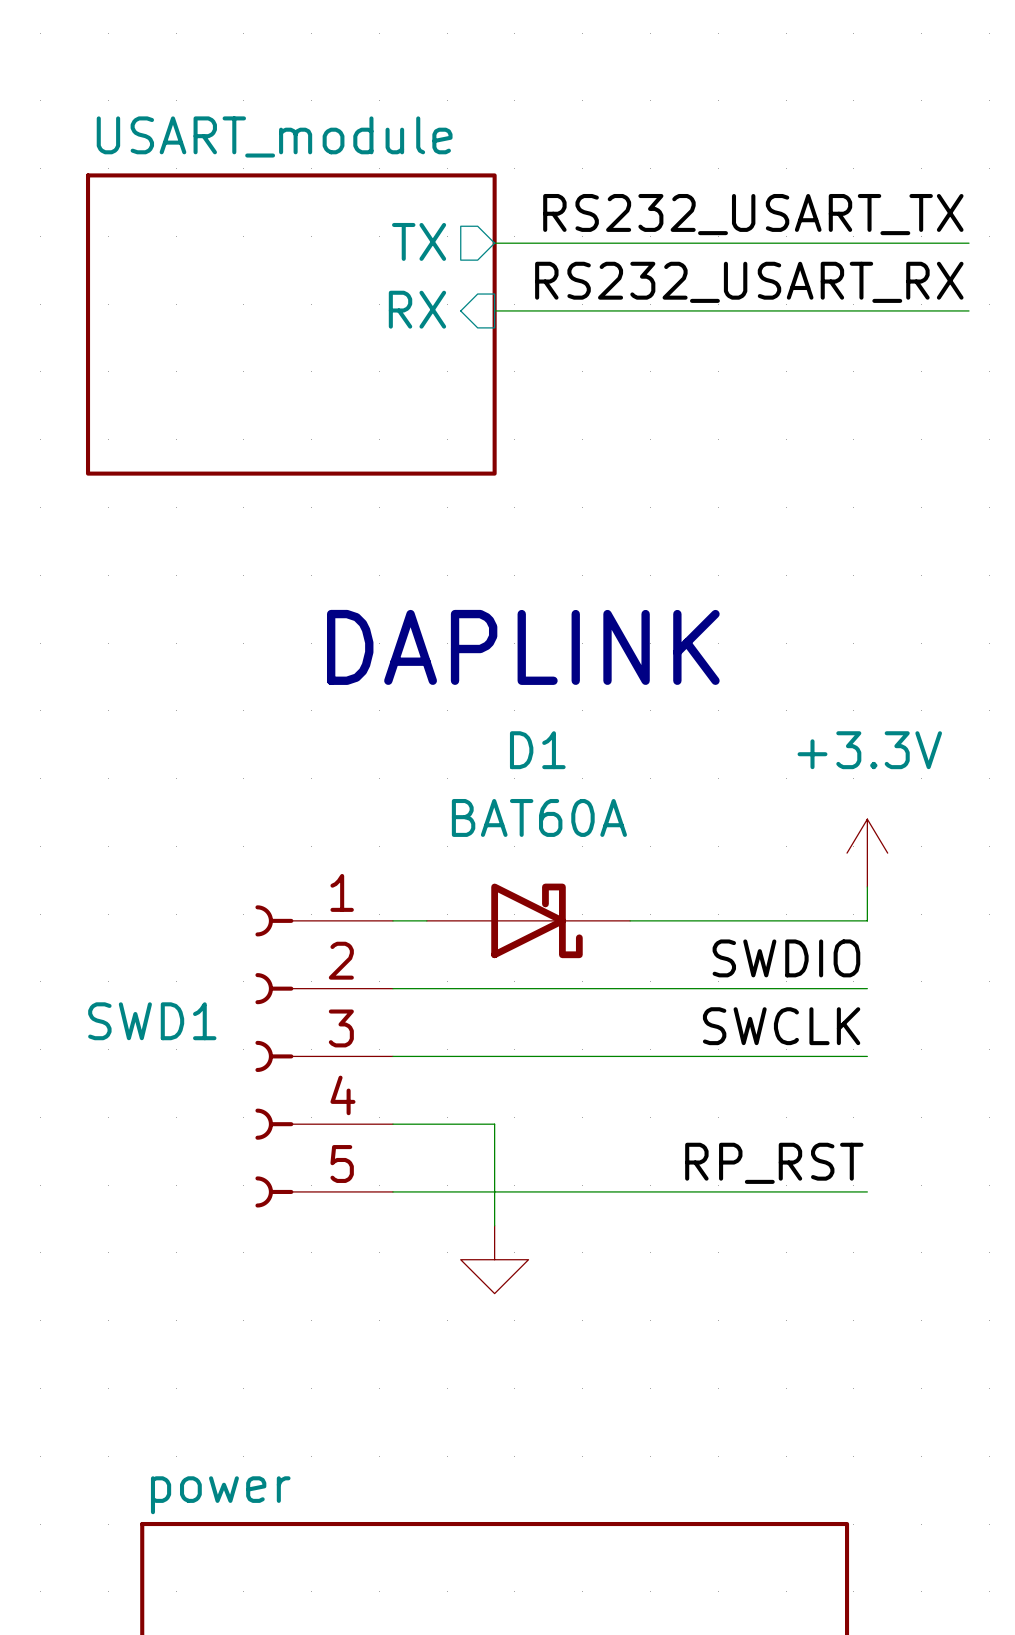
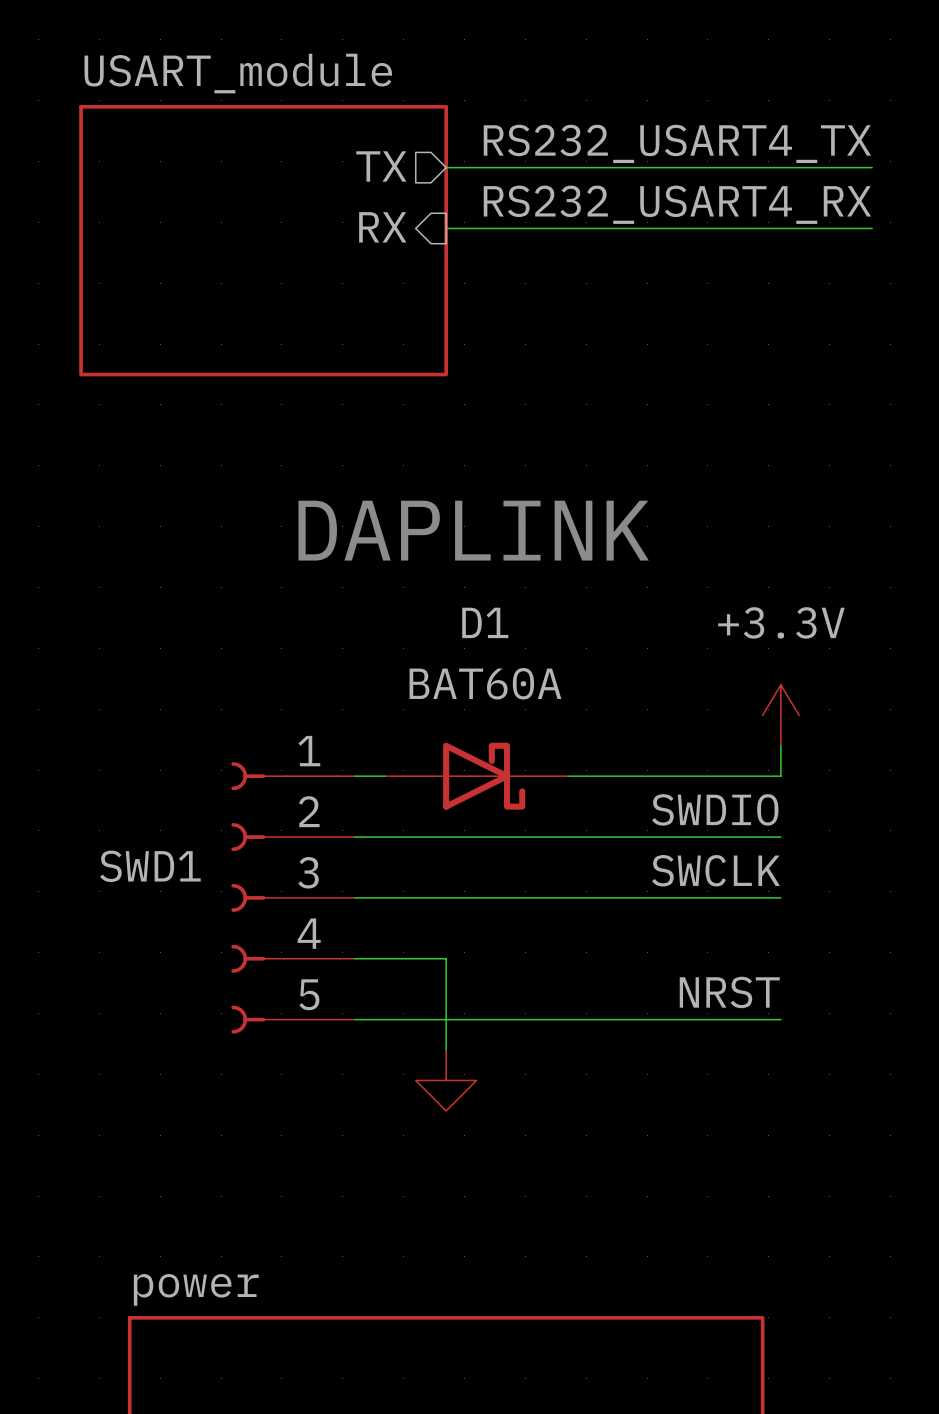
label: RS232_USART_TX (753, 214) -> RS232_USART4_TX (677, 143)
label: RS232_USART_RX (749, 282) -> RS232_USART4_RX (677, 204)
label: RP_RST (774, 1163) -> NRST (729, 992)

